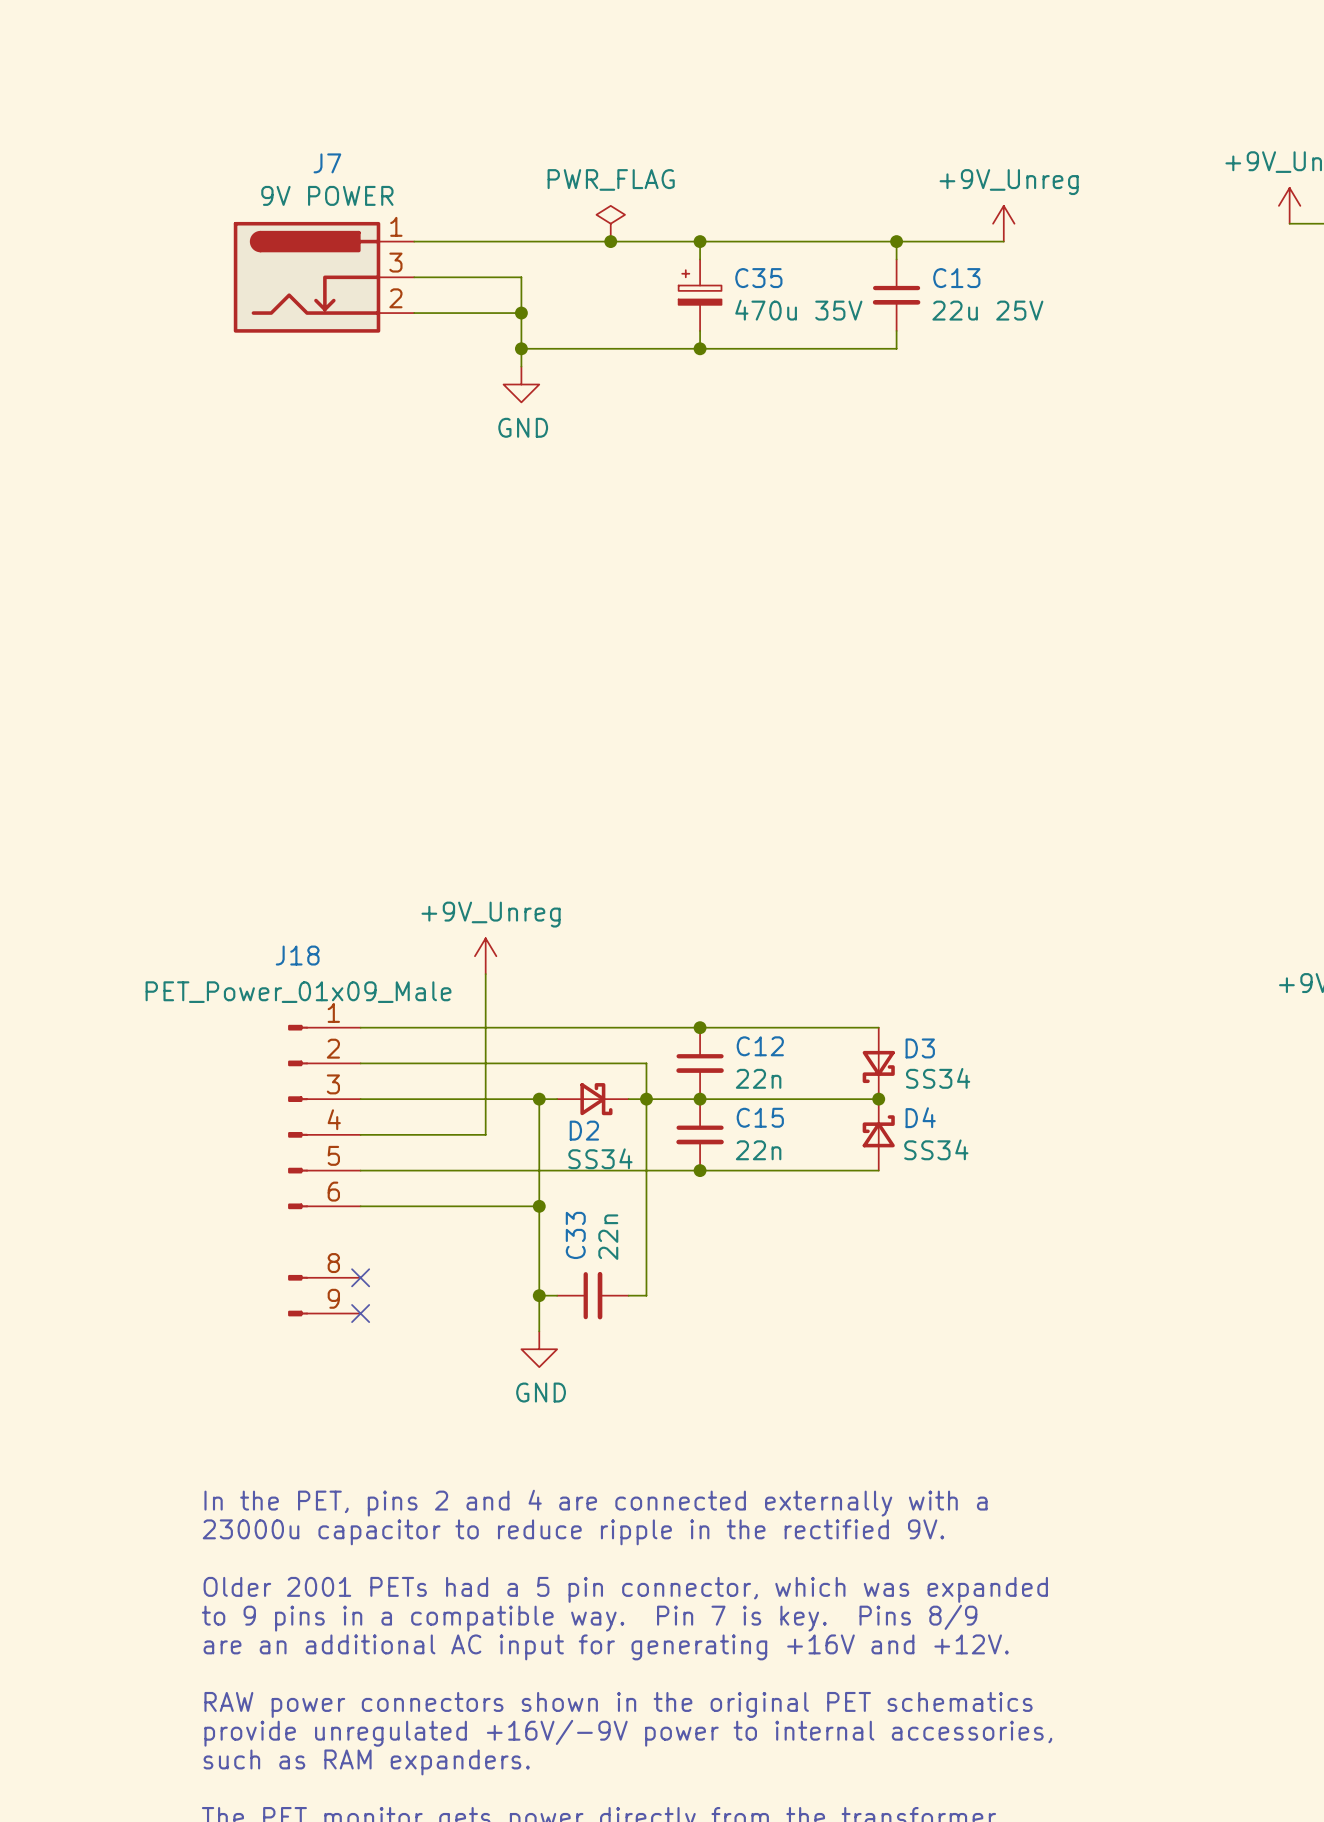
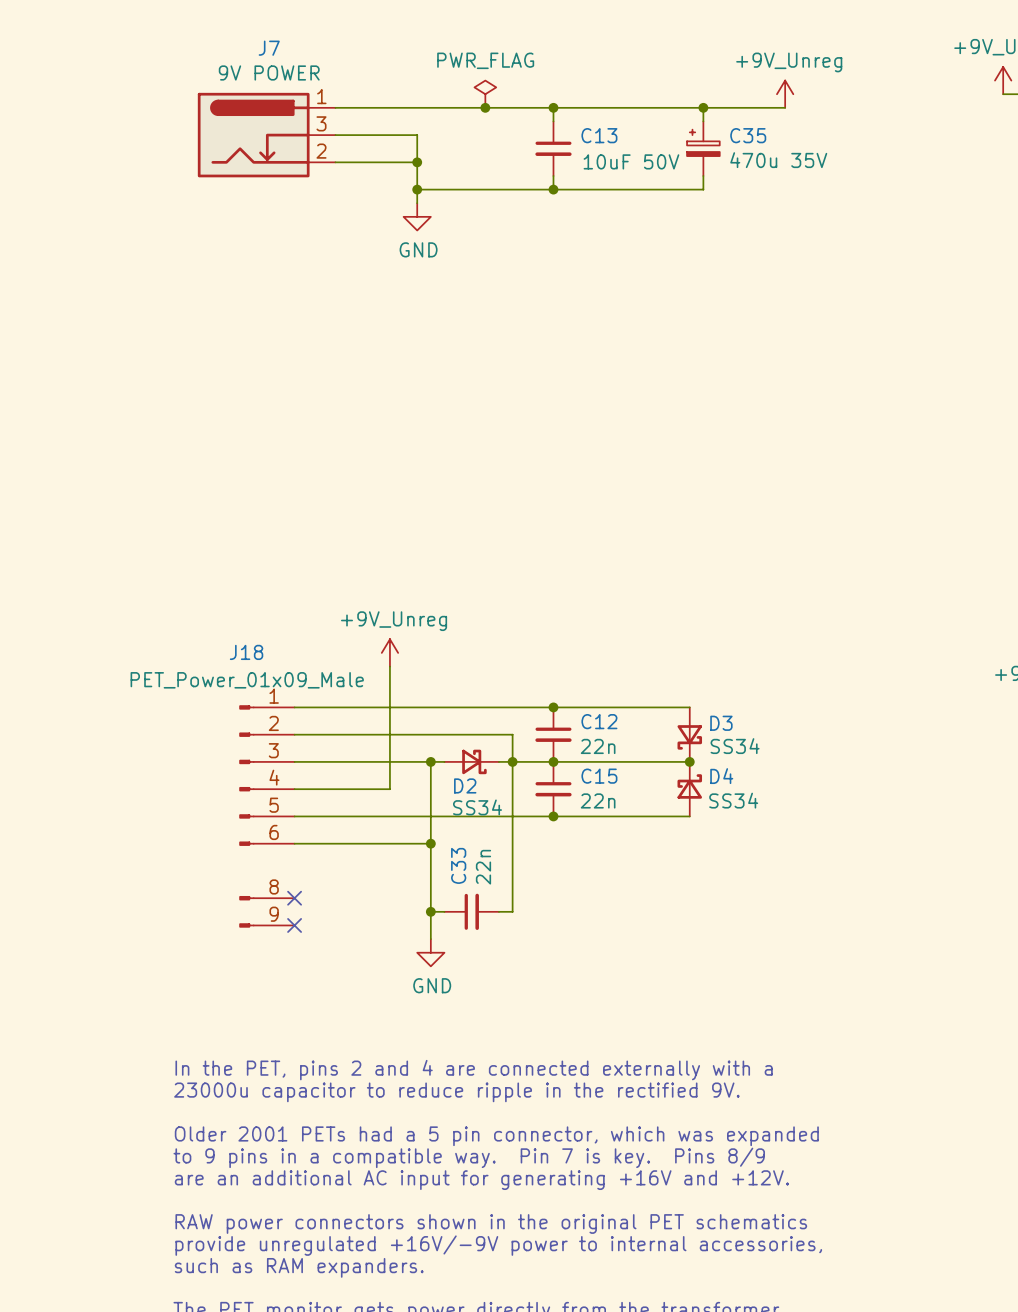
C35 position: (700, 295) -> (703, 148)
C13 position: (896, 295) -> (553, 148)
C13 value: 22u 25V (987, 310) -> 10uF 50V (631, 161)

